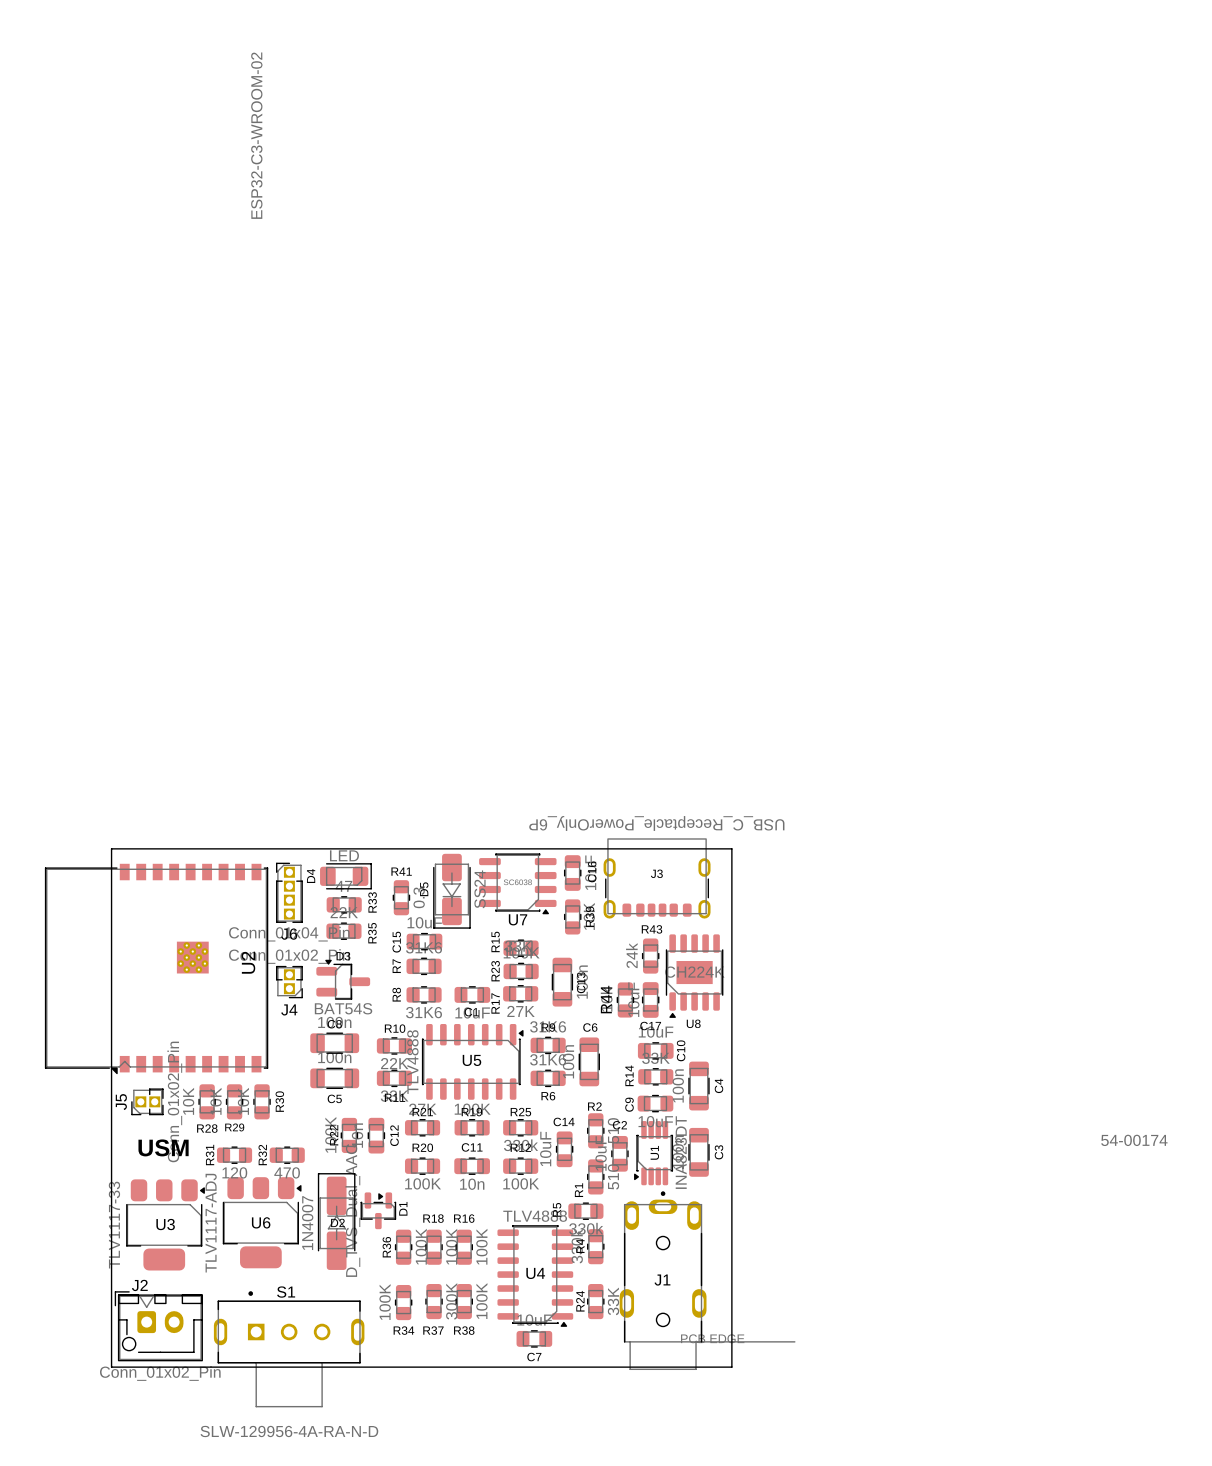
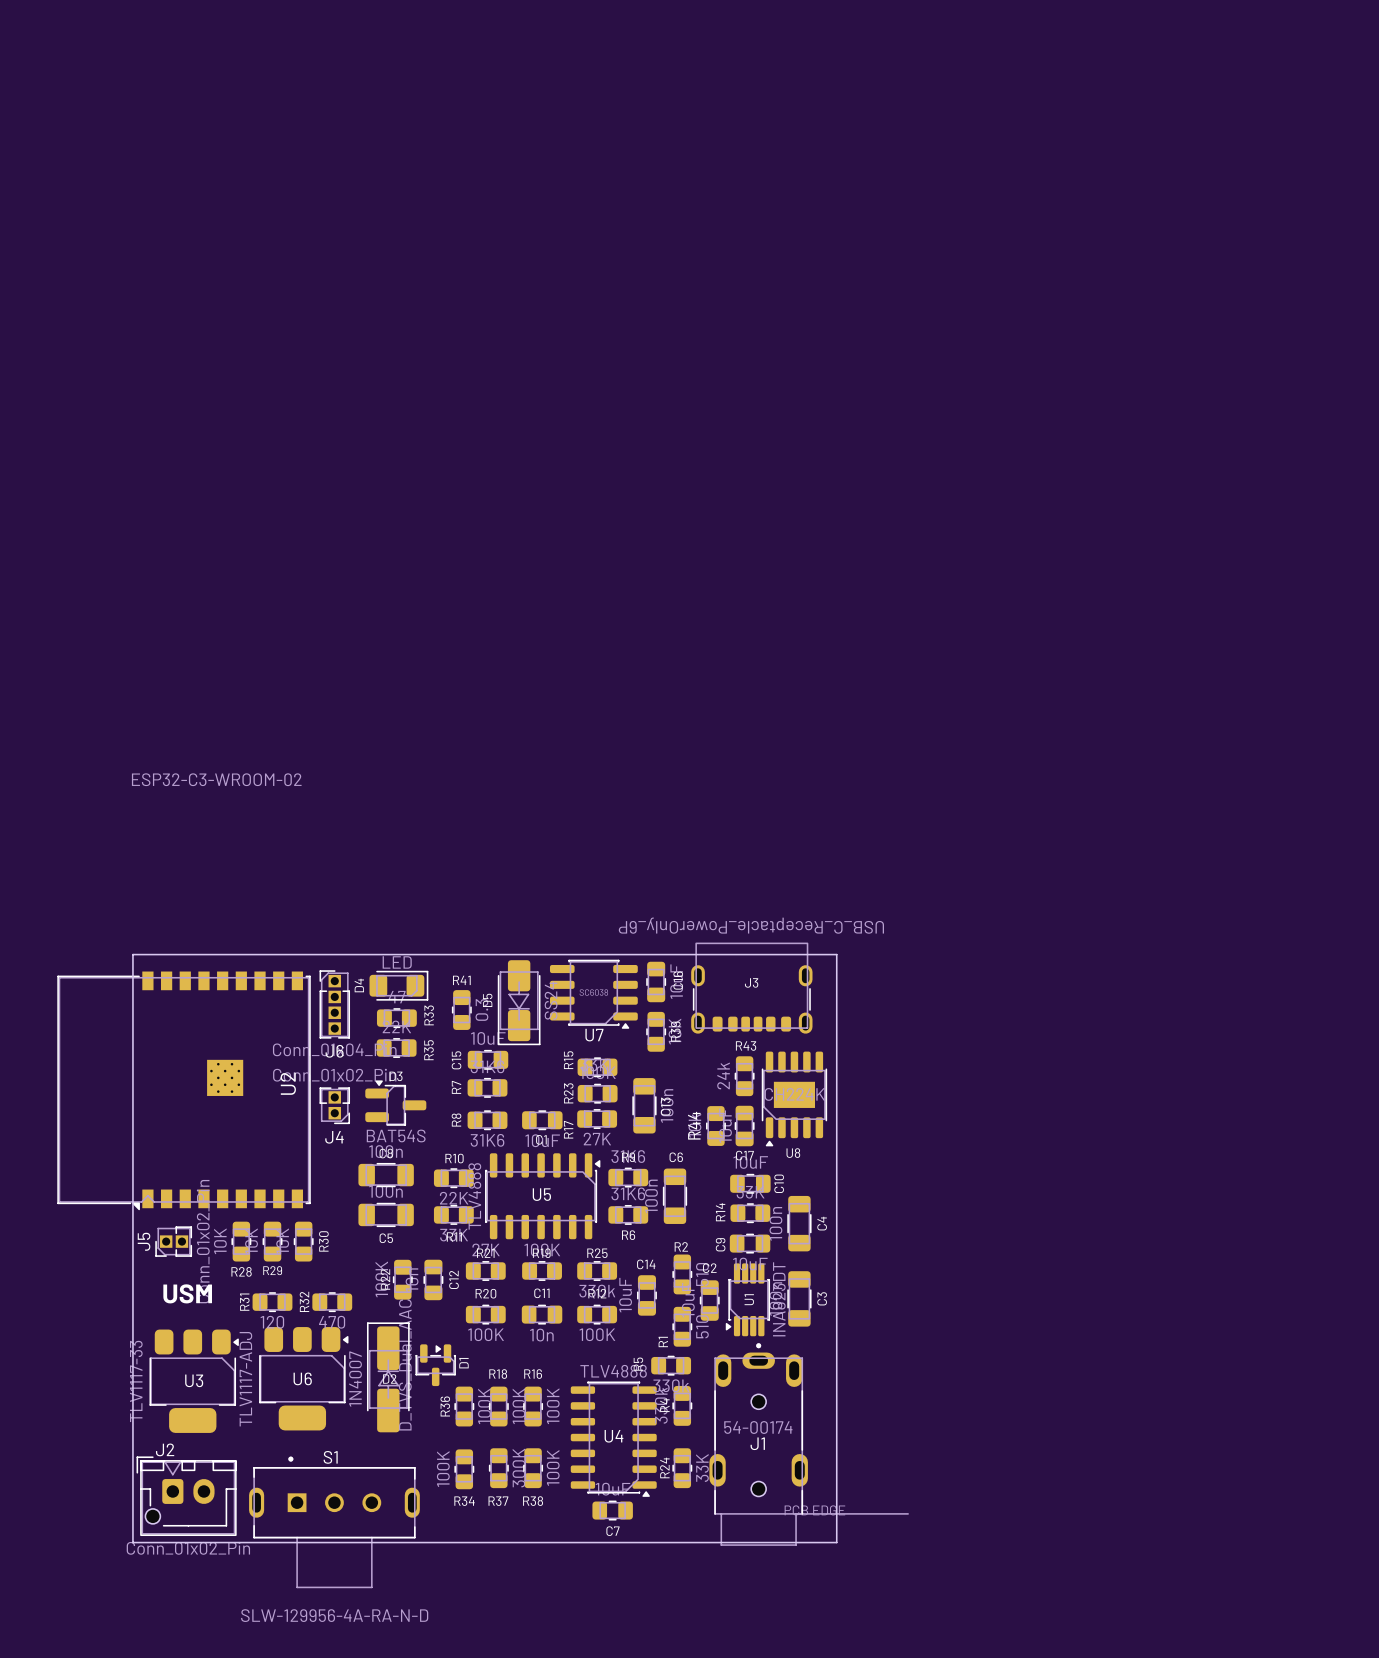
U2 value rotation: 0° (256, 135) -> 90° clockwise (216, 779)
U2 value position: ESP32-C3-WROOM-02 (256, 135) -> ESP32-C3-WROOM-02 (216, 779)
J1 value position: 54-00174 (1134, 1140) -> 54-00174 (758, 1427)

